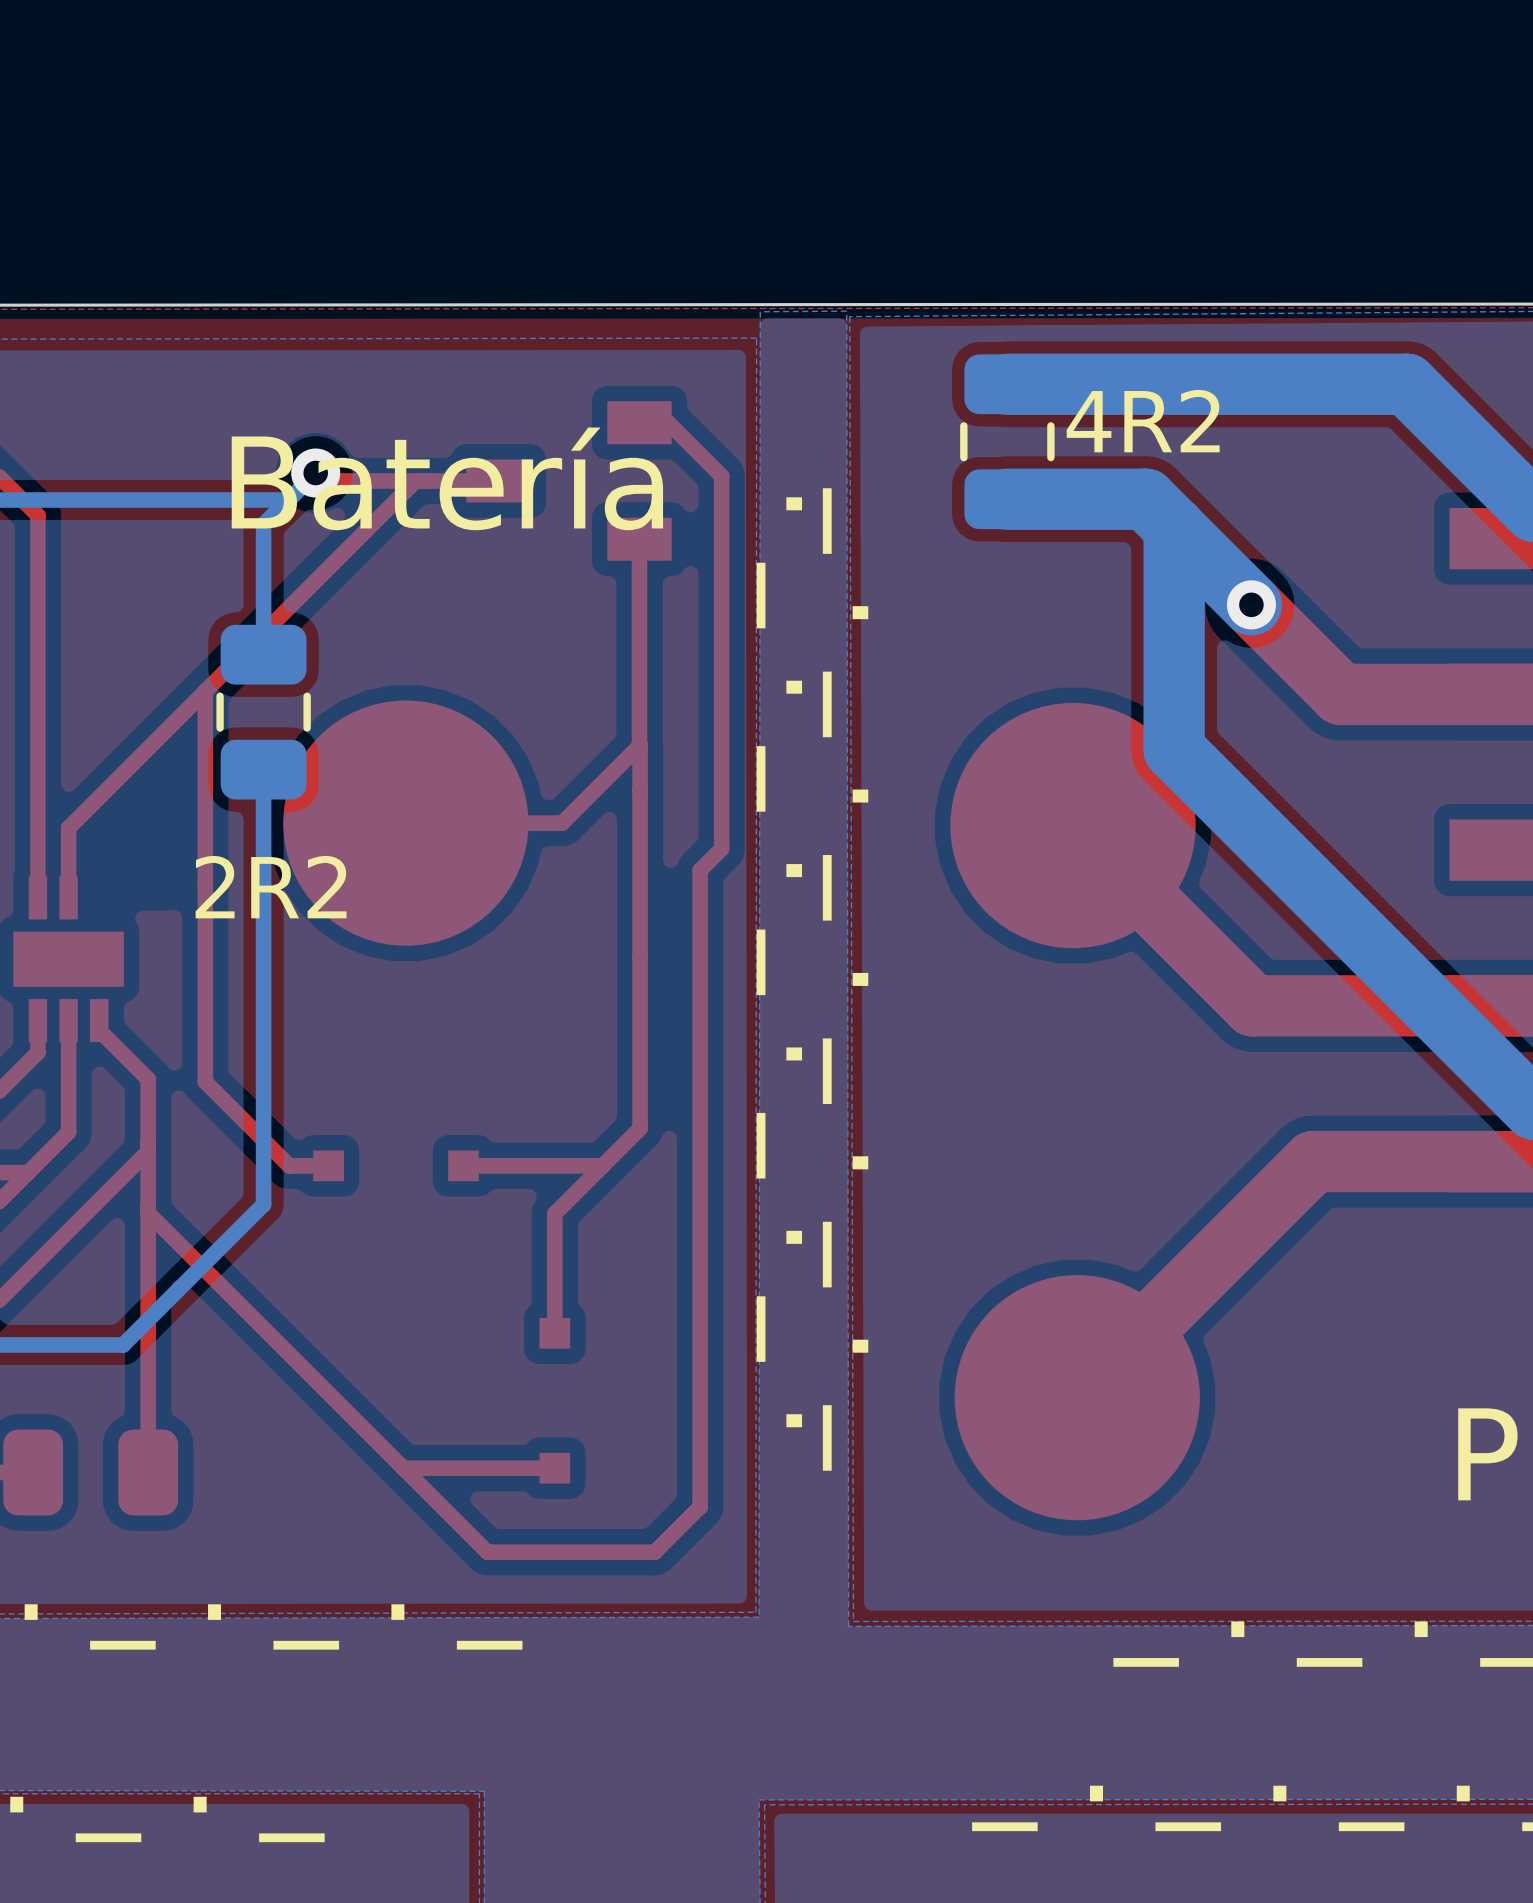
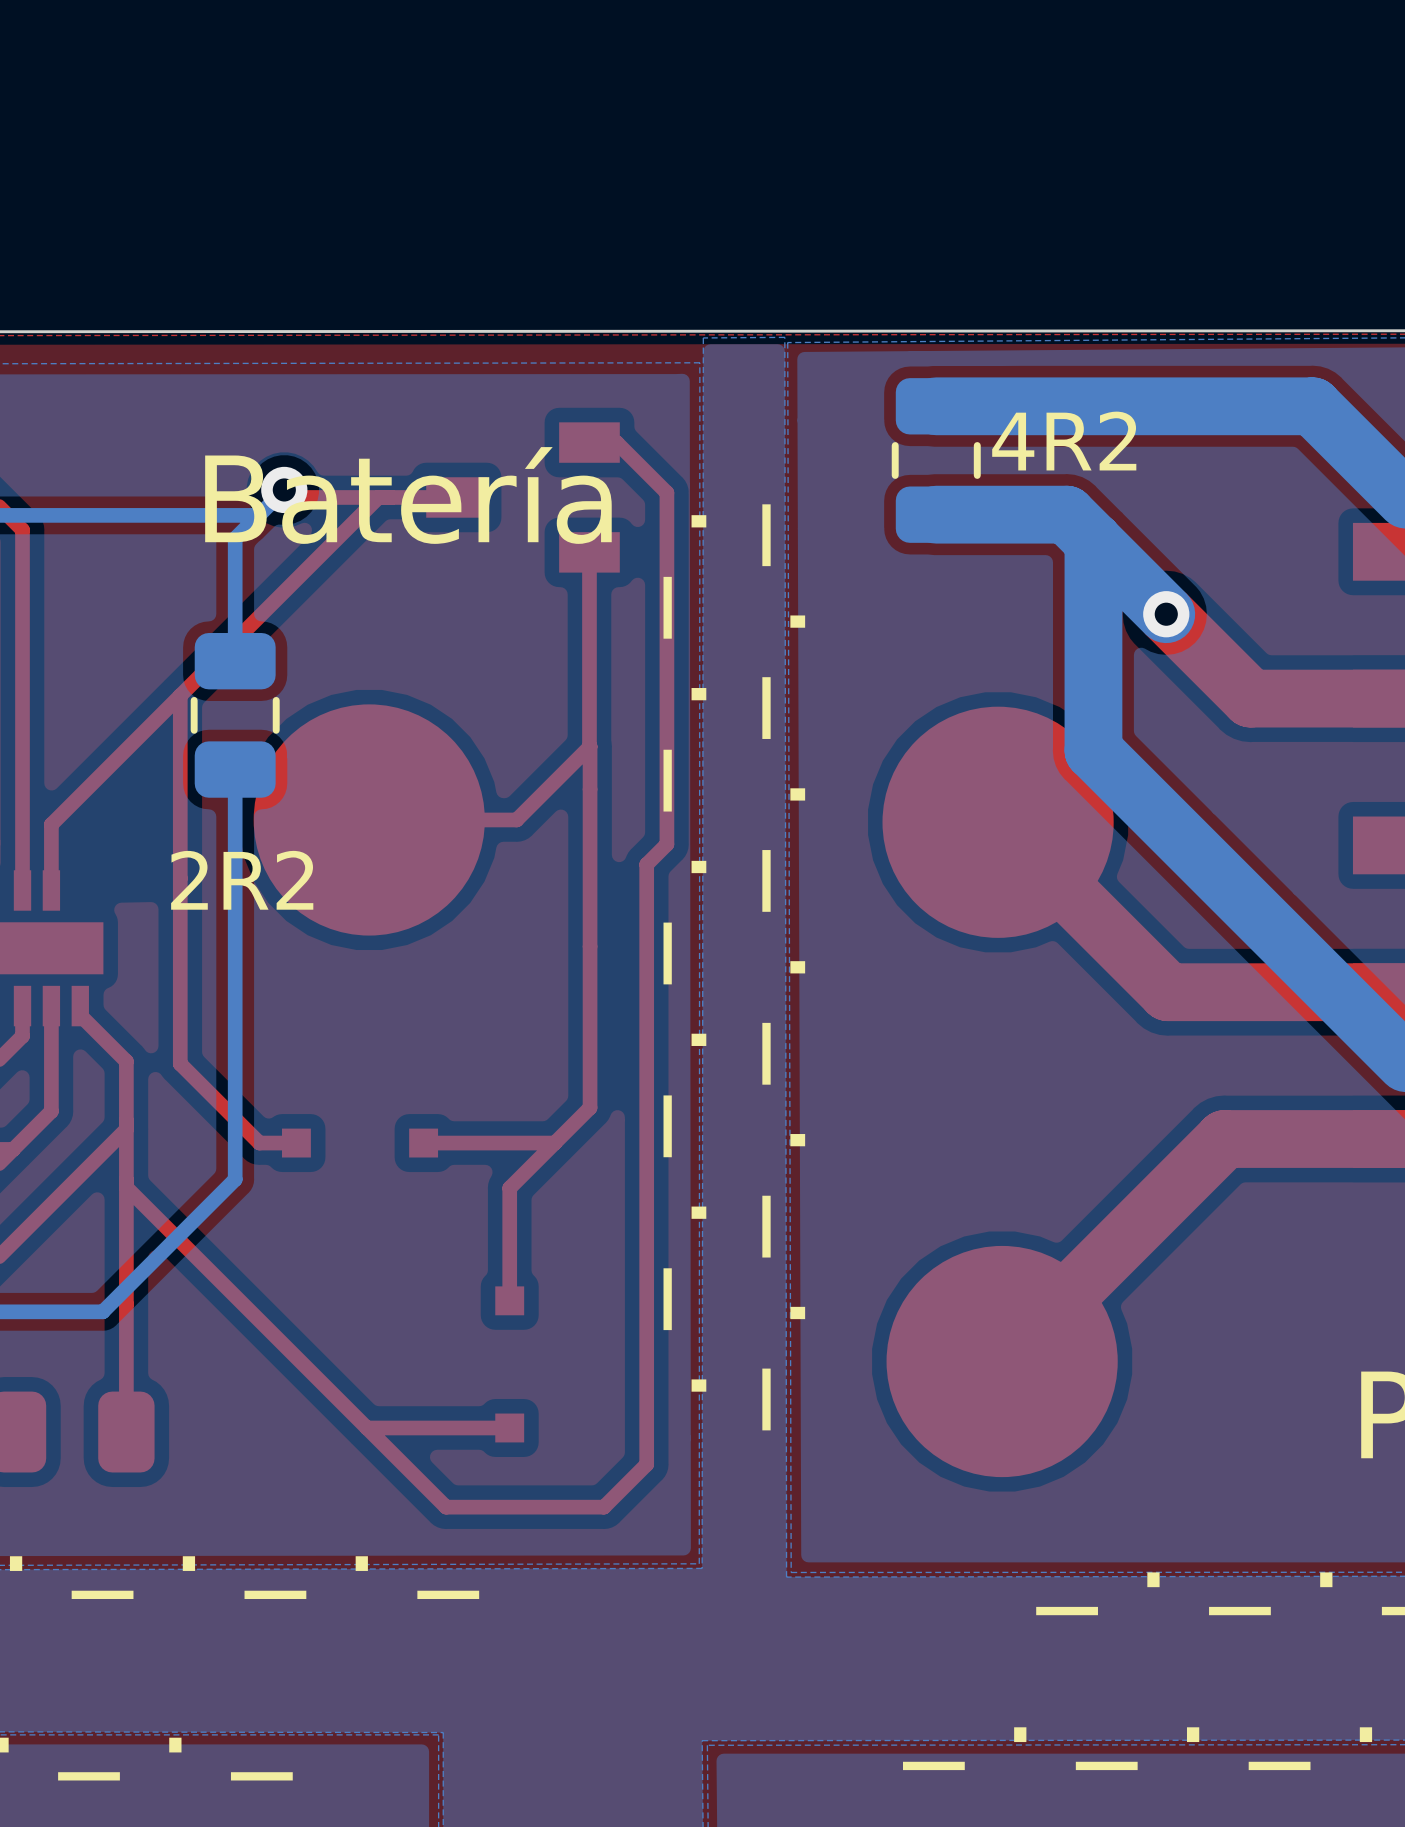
text position: . _ . _ . _ . _ . _ . (779, 962) -> . _ . _ . _ . _ . _ . (684, 953)

